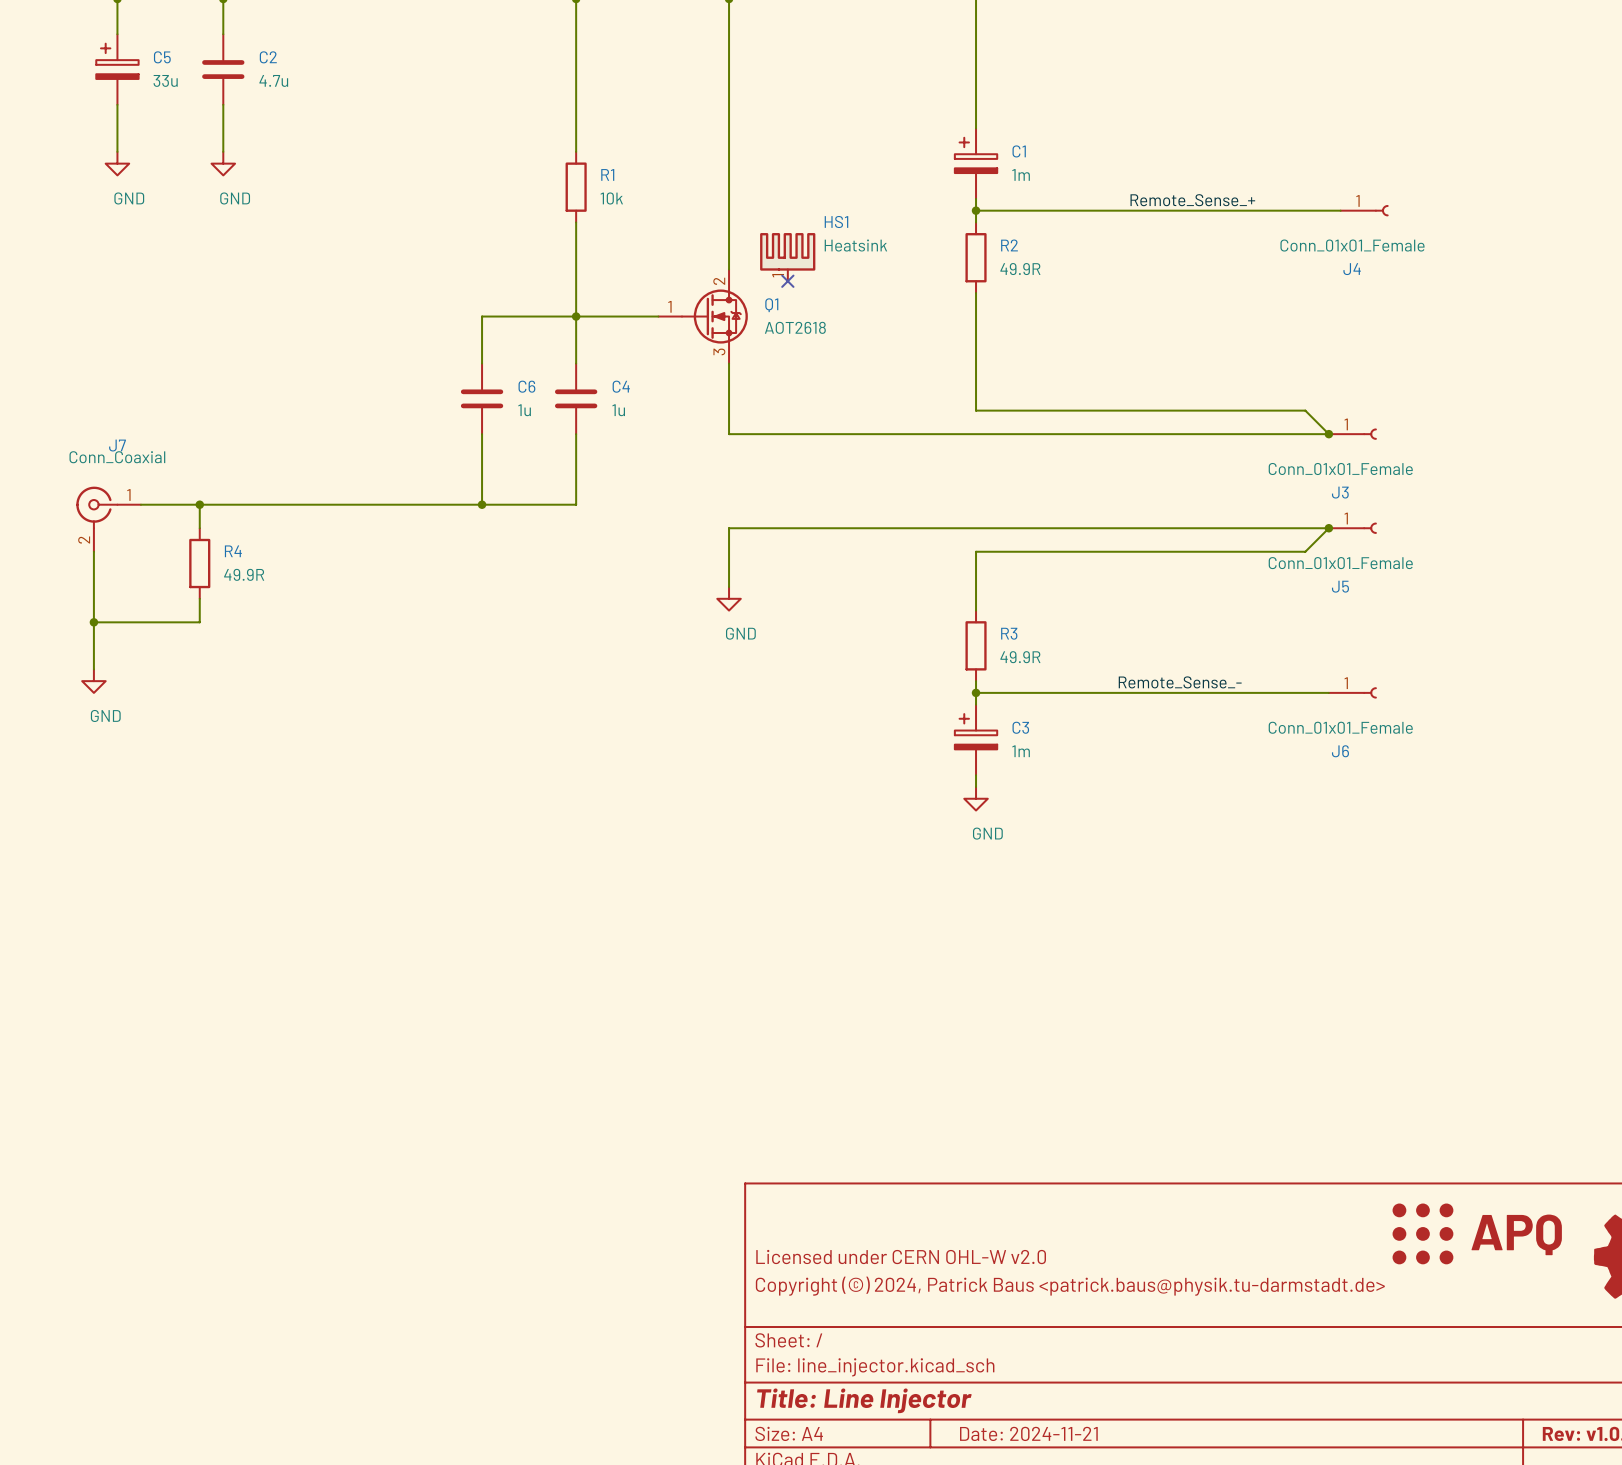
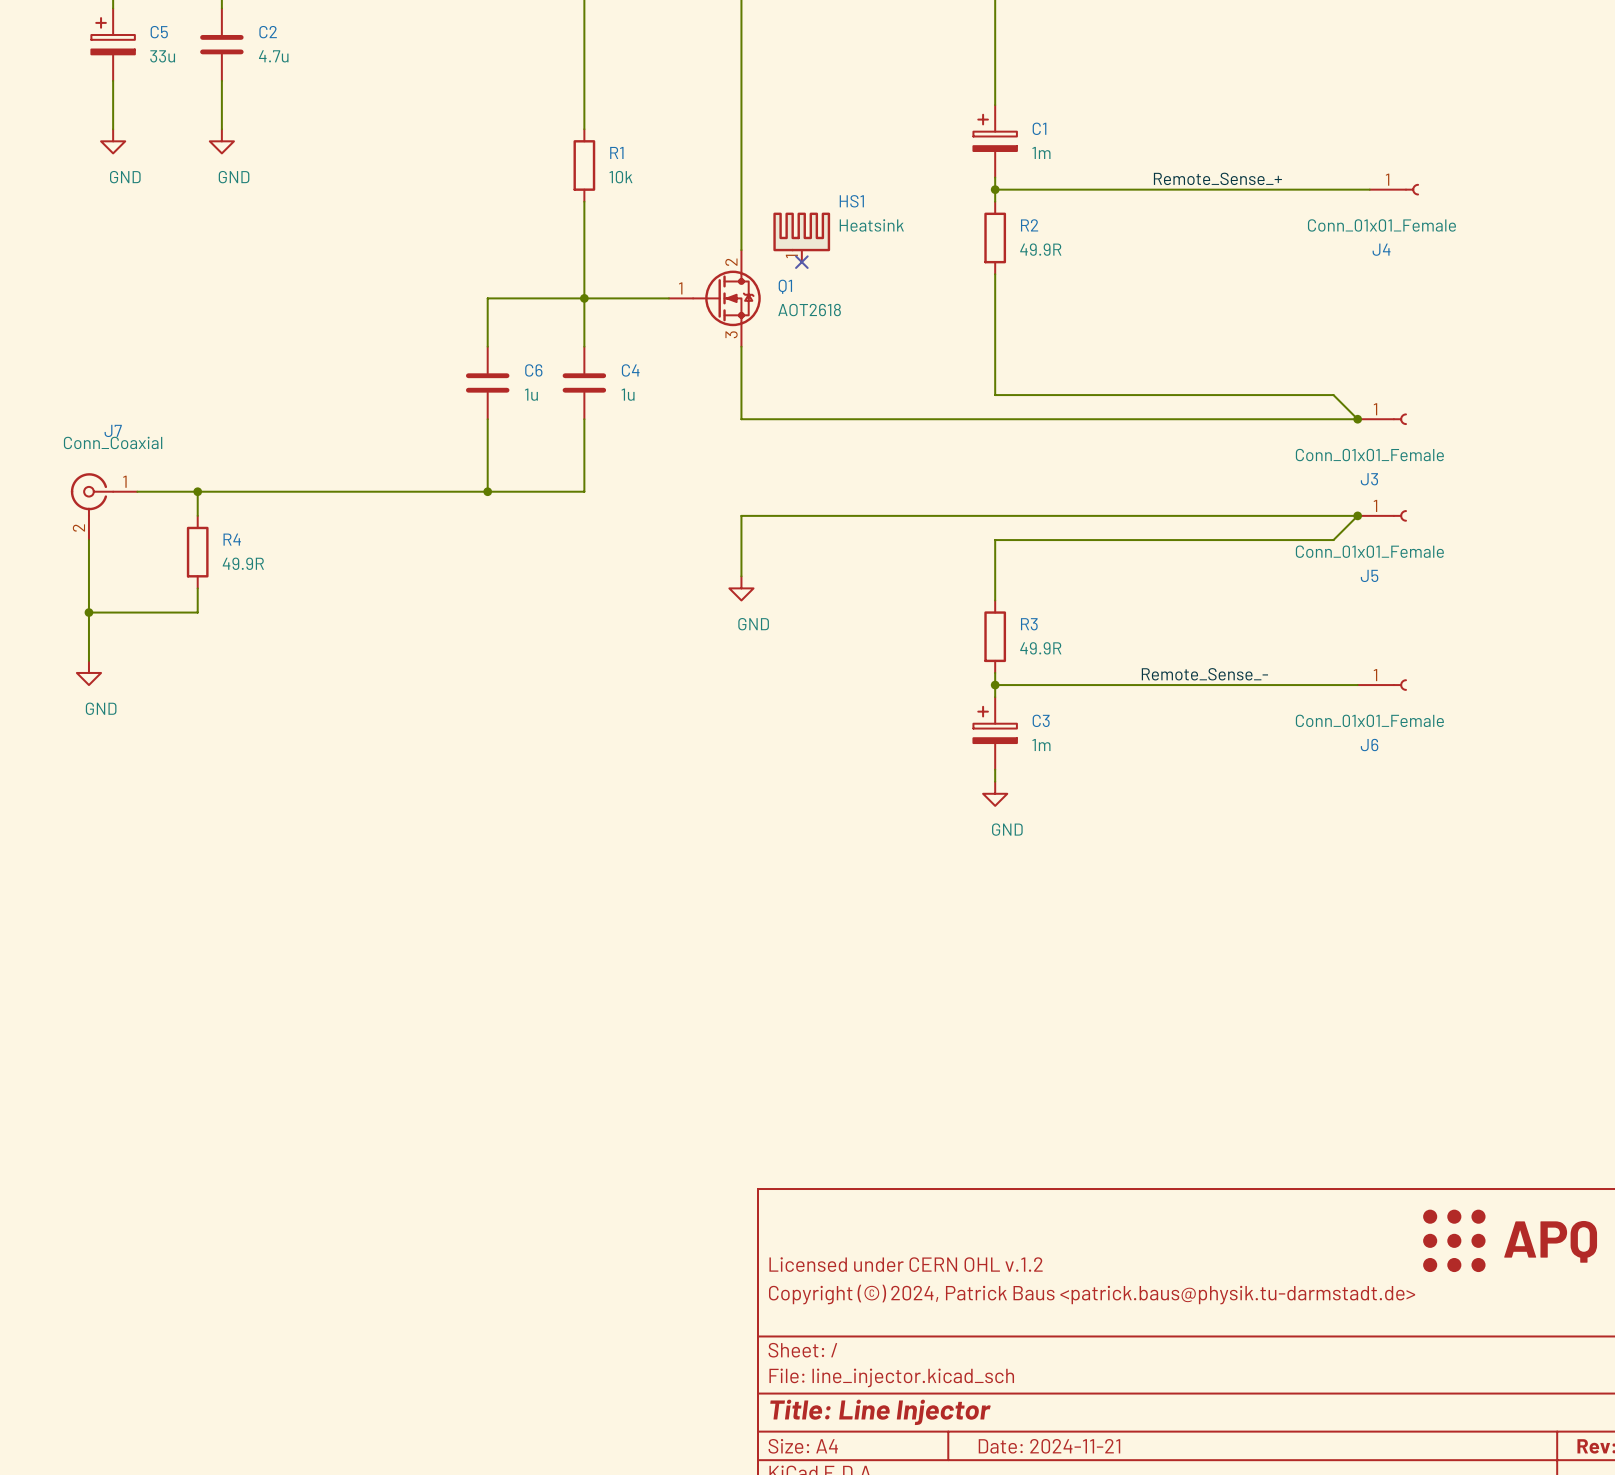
title block: Licensed under CERN OHL-W v2.0 (901, 1257) -> Licensed under CERN OHL v.1.2 (906, 1264)

